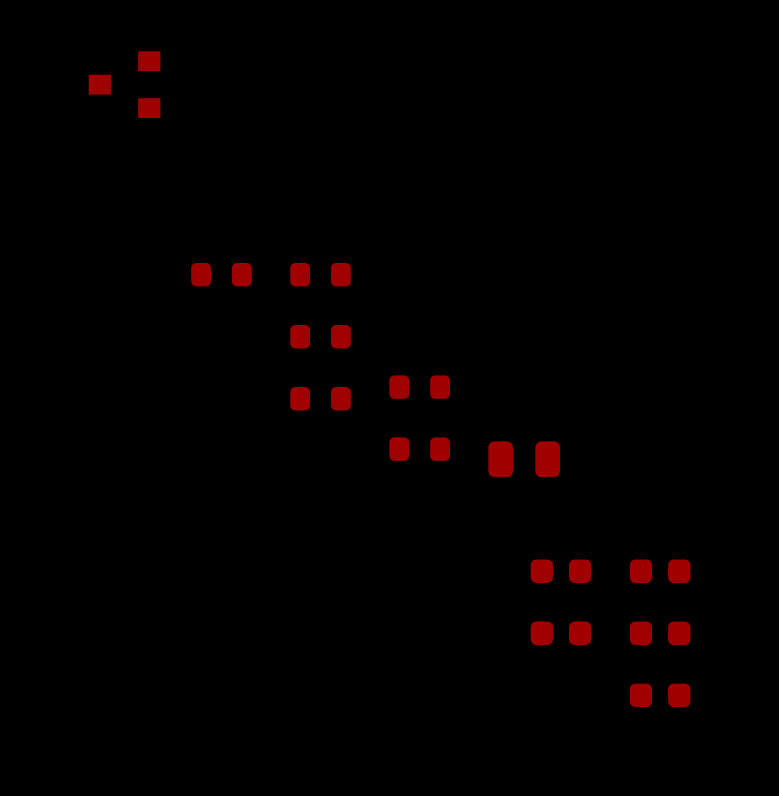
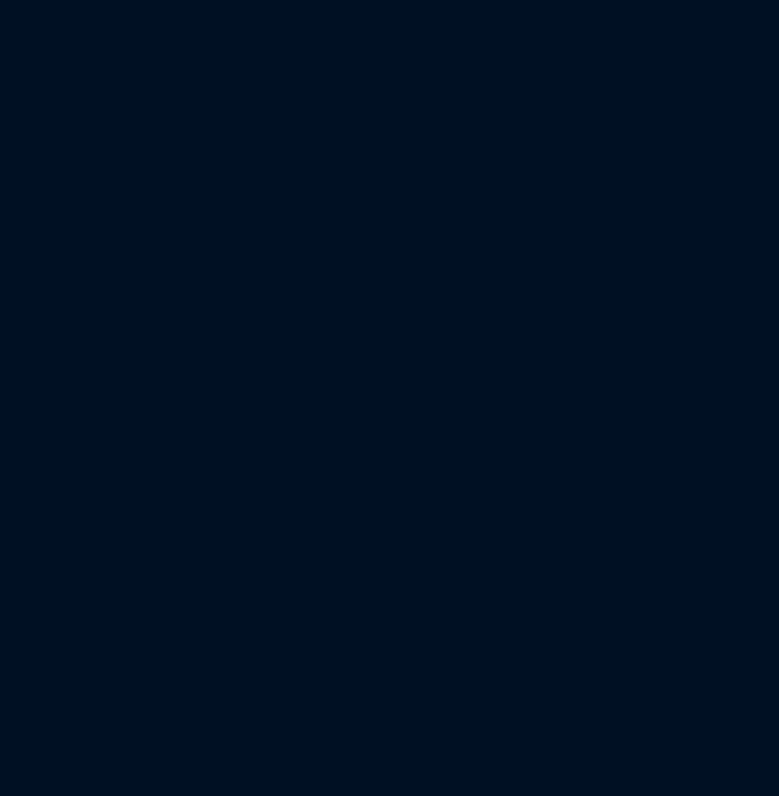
part: (124, 84) -> none
part: (221, 274) -> none
part: (320, 274) -> none
part: (320, 336) -> none
part: (419, 387) -> none
part: (320, 398) -> none
part: (419, 449) -> none
part: (524, 459) -> none
part: (561, 571) -> none
part: (660, 571) -> none
part: (561, 633) -> none
part: (660, 633) -> none
part: (660, 695) -> none

